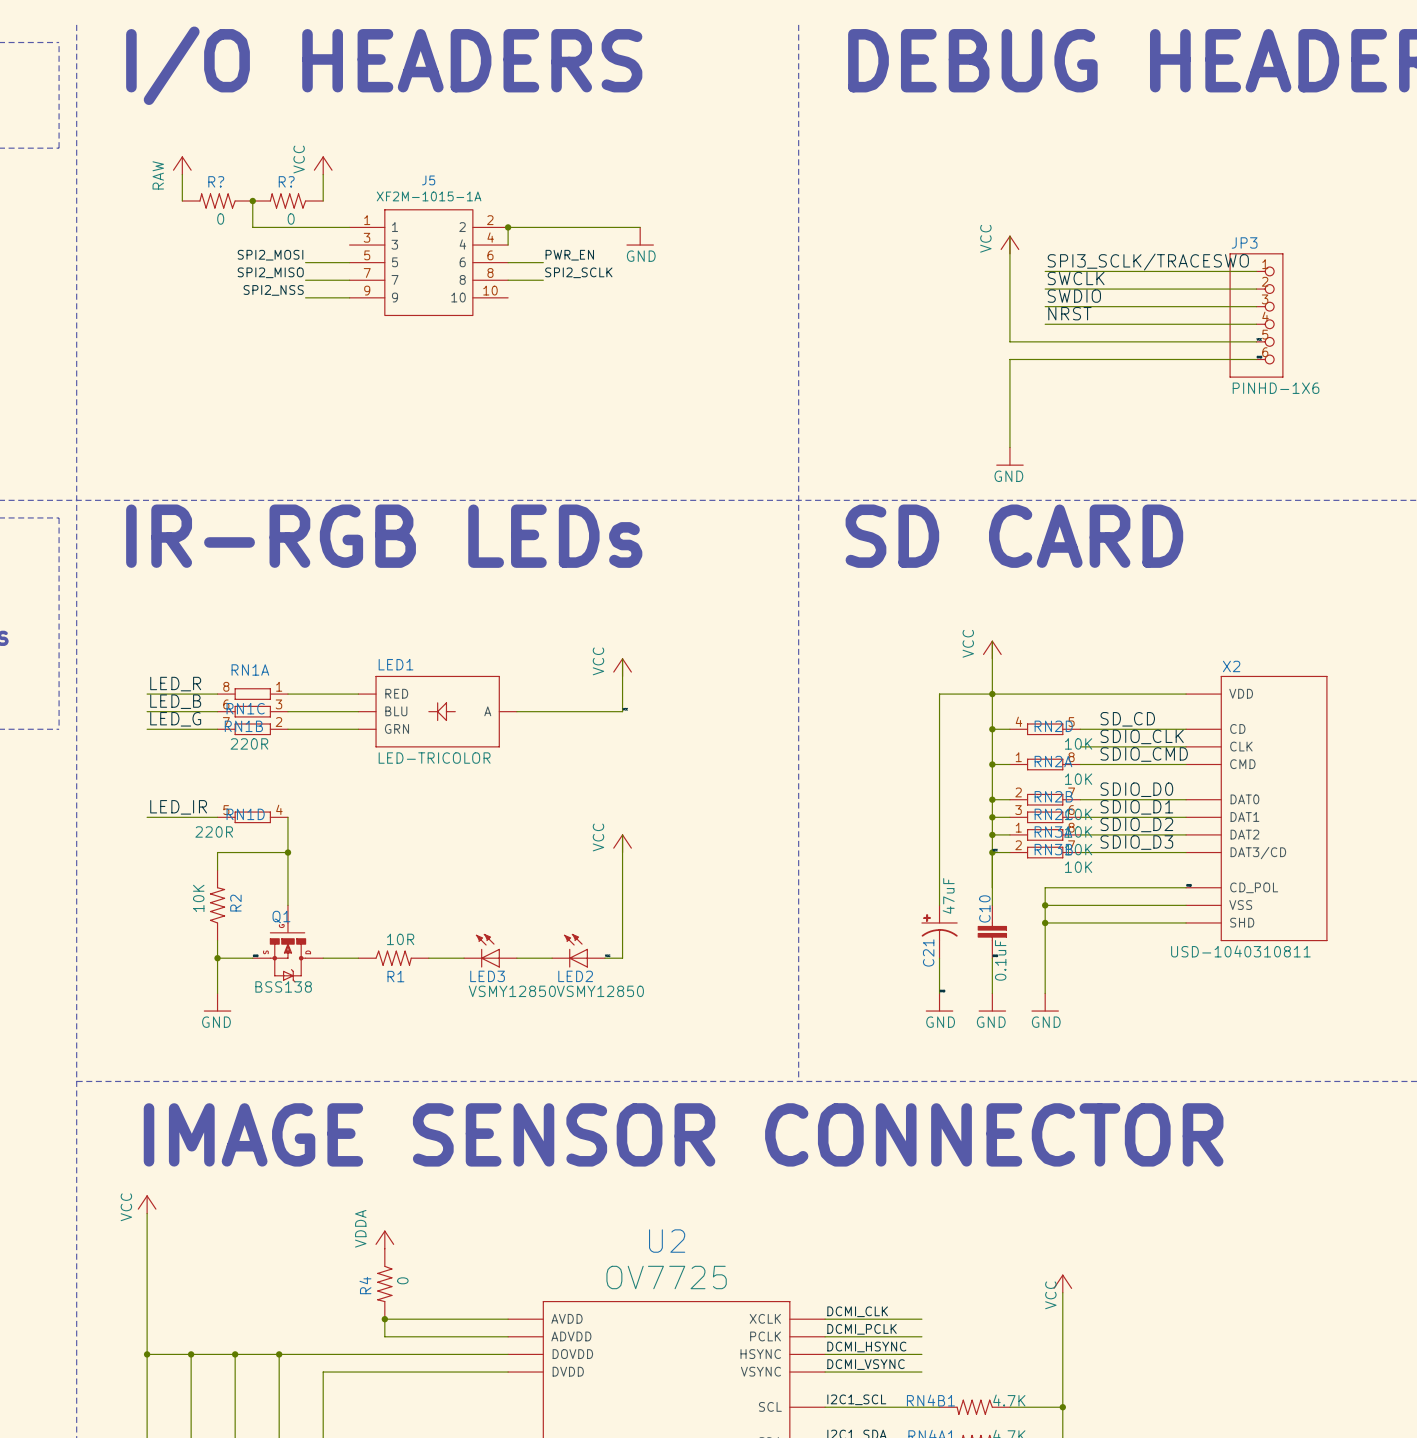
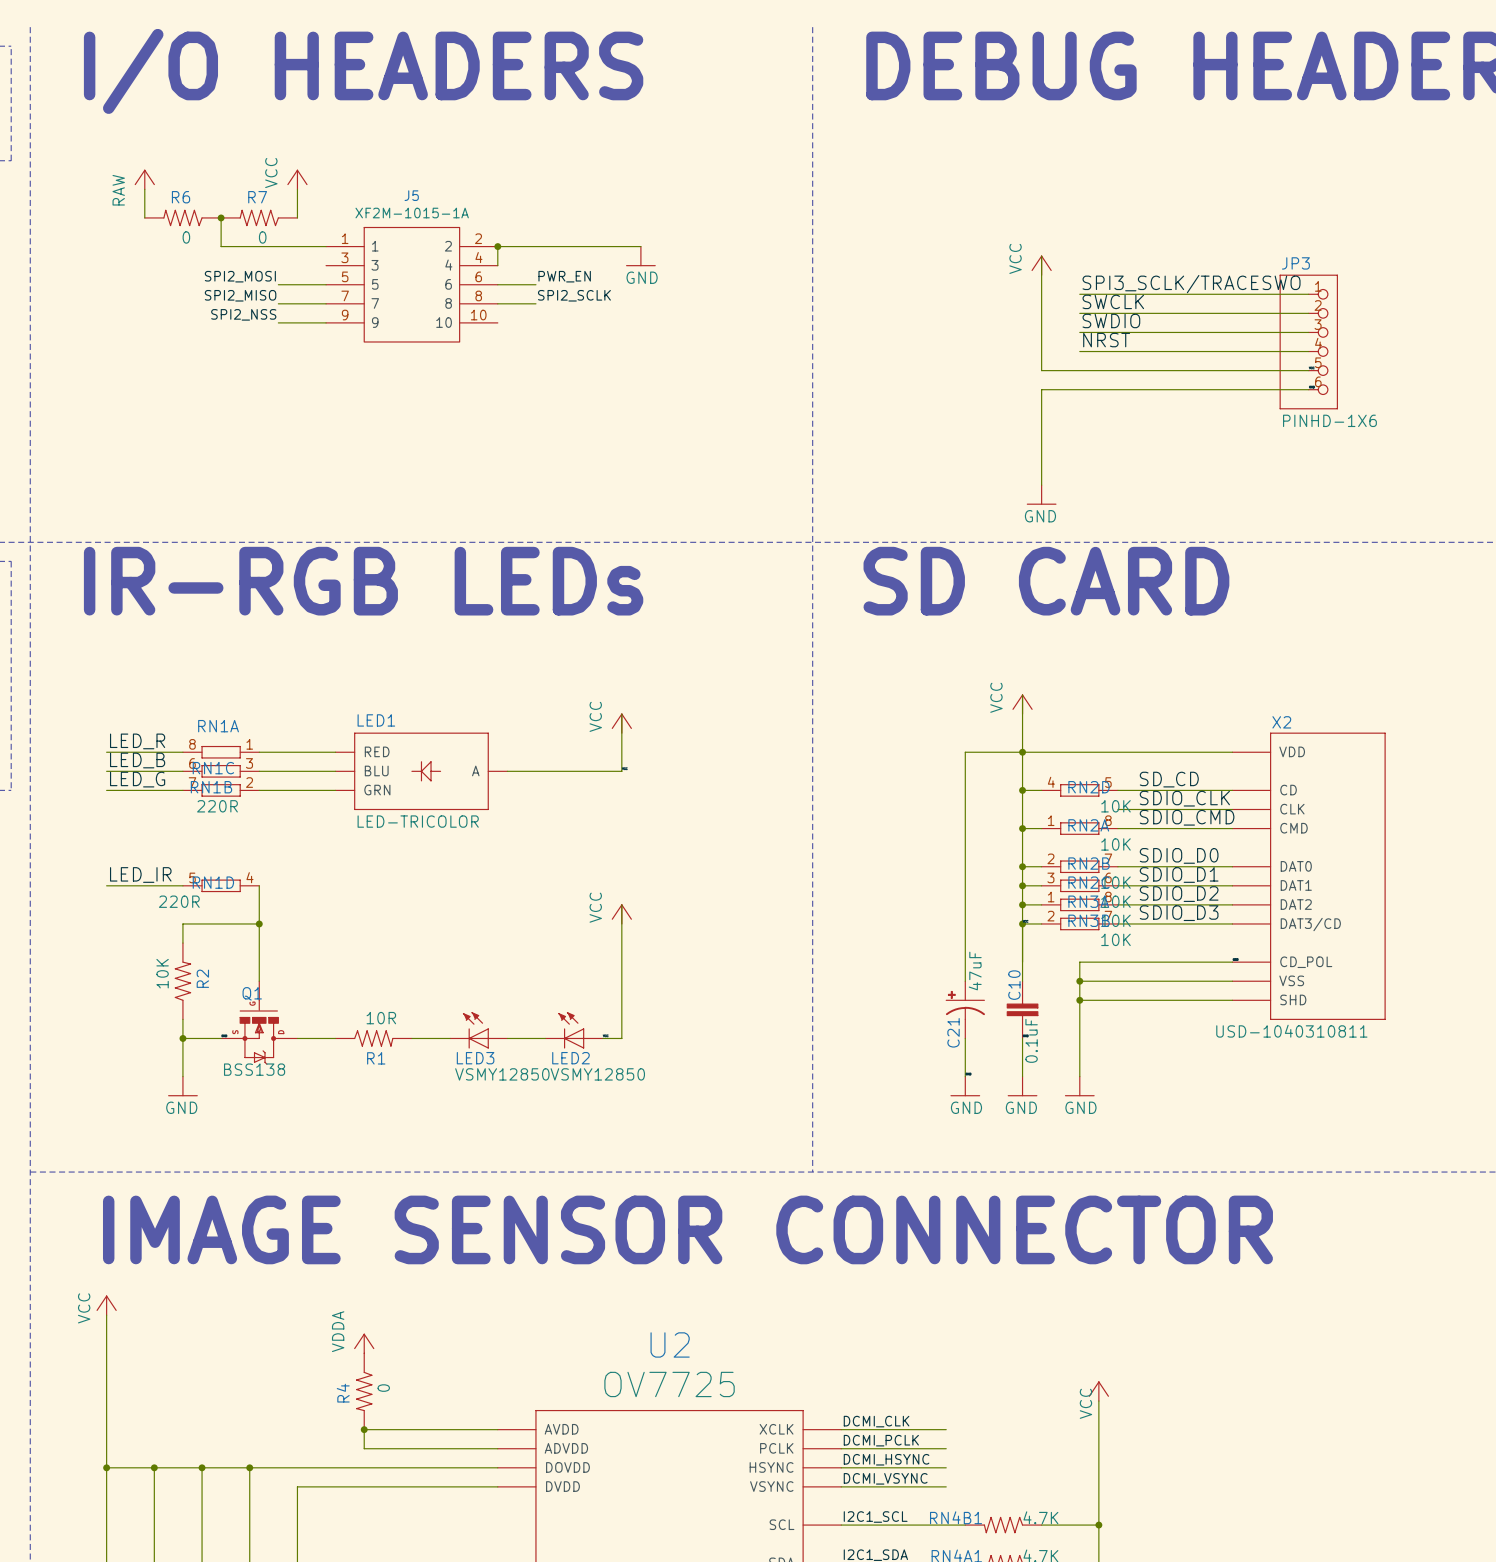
R? name: R? (216, 181) -> R6 (181, 197)
R? name: R? (286, 181) -> R7 (257, 197)

